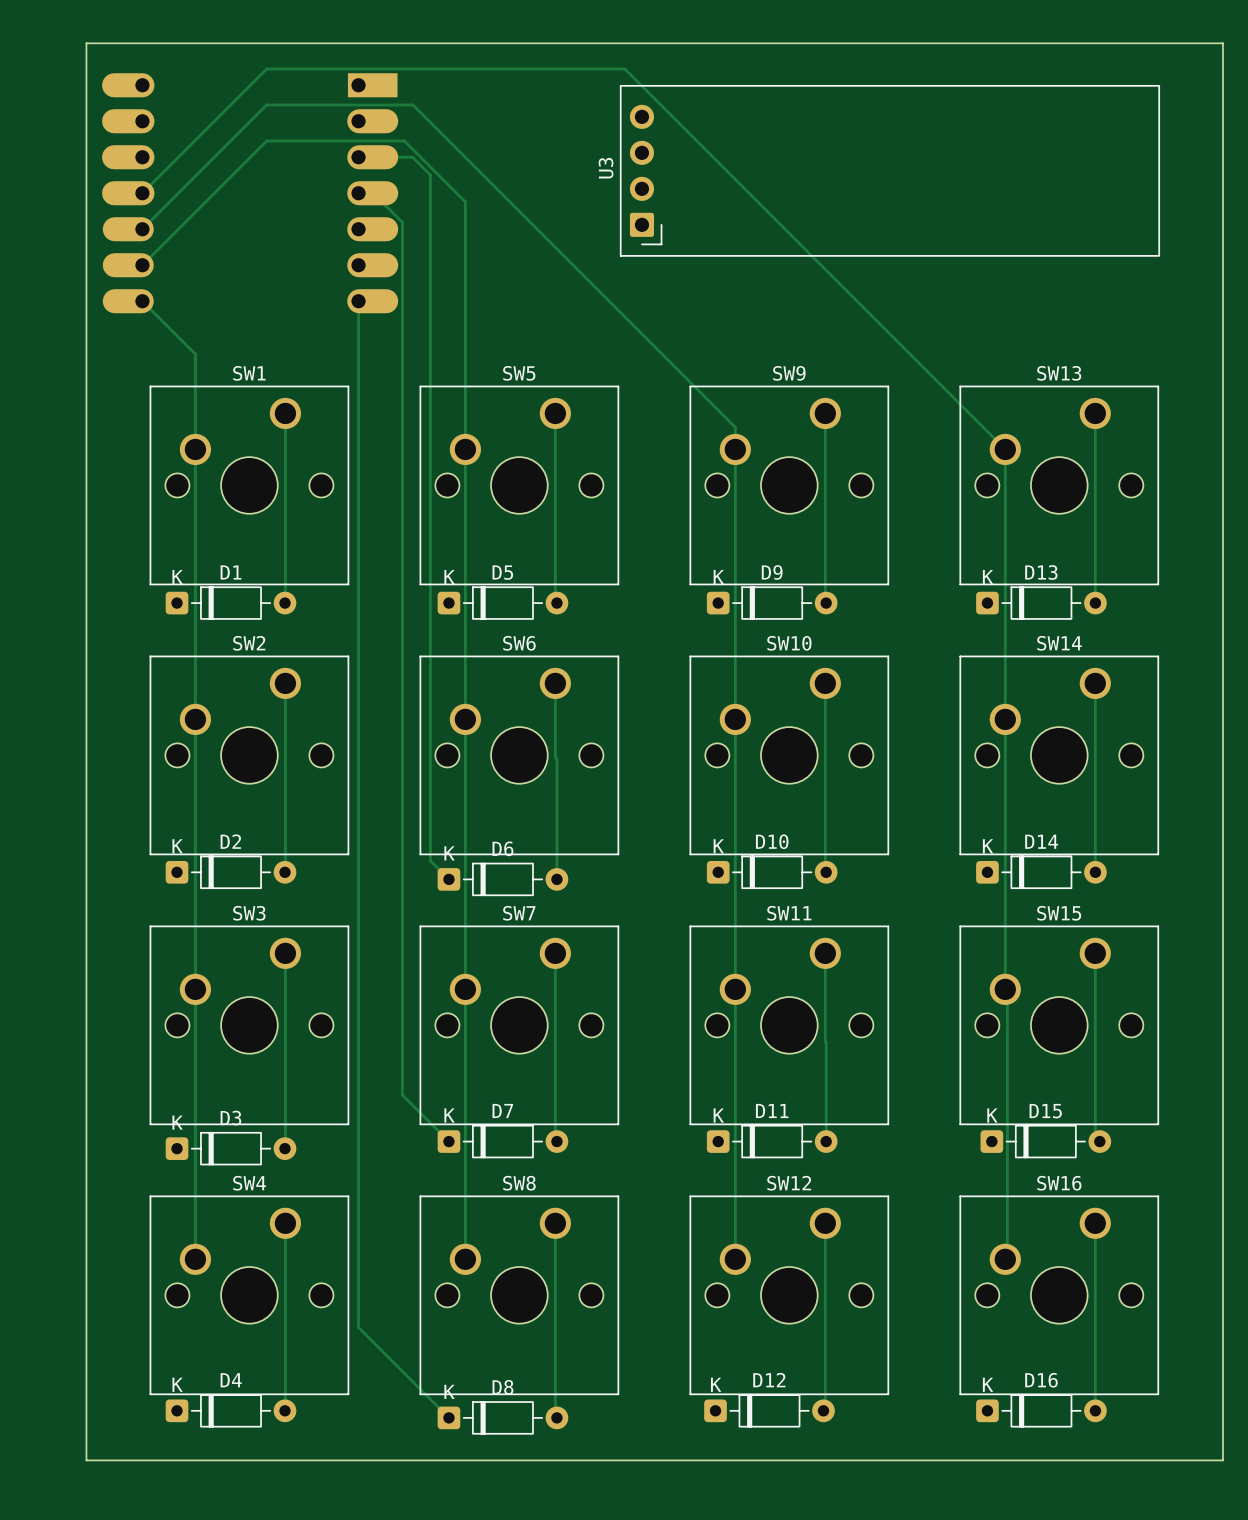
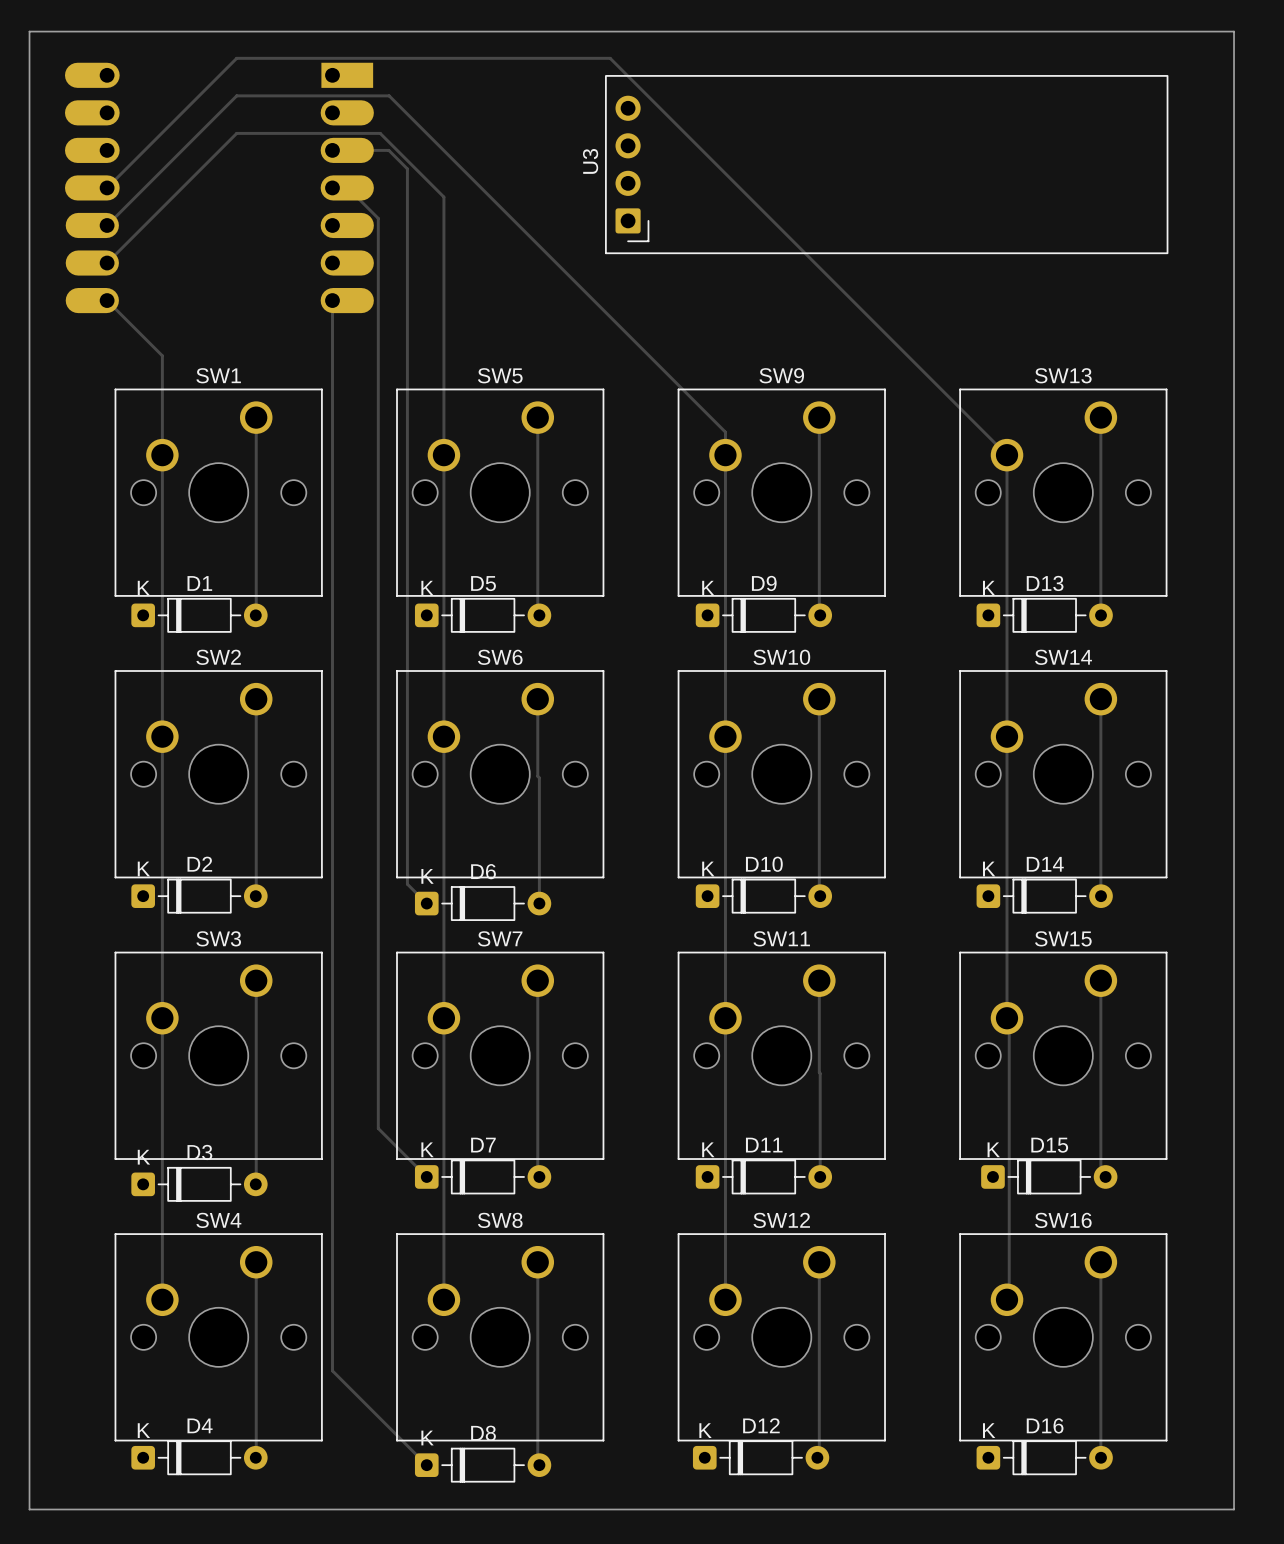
board edge: (86, 43) (86, 1460) -> (48, 31) (29, 31) (29, 1509) (48, 1509)

